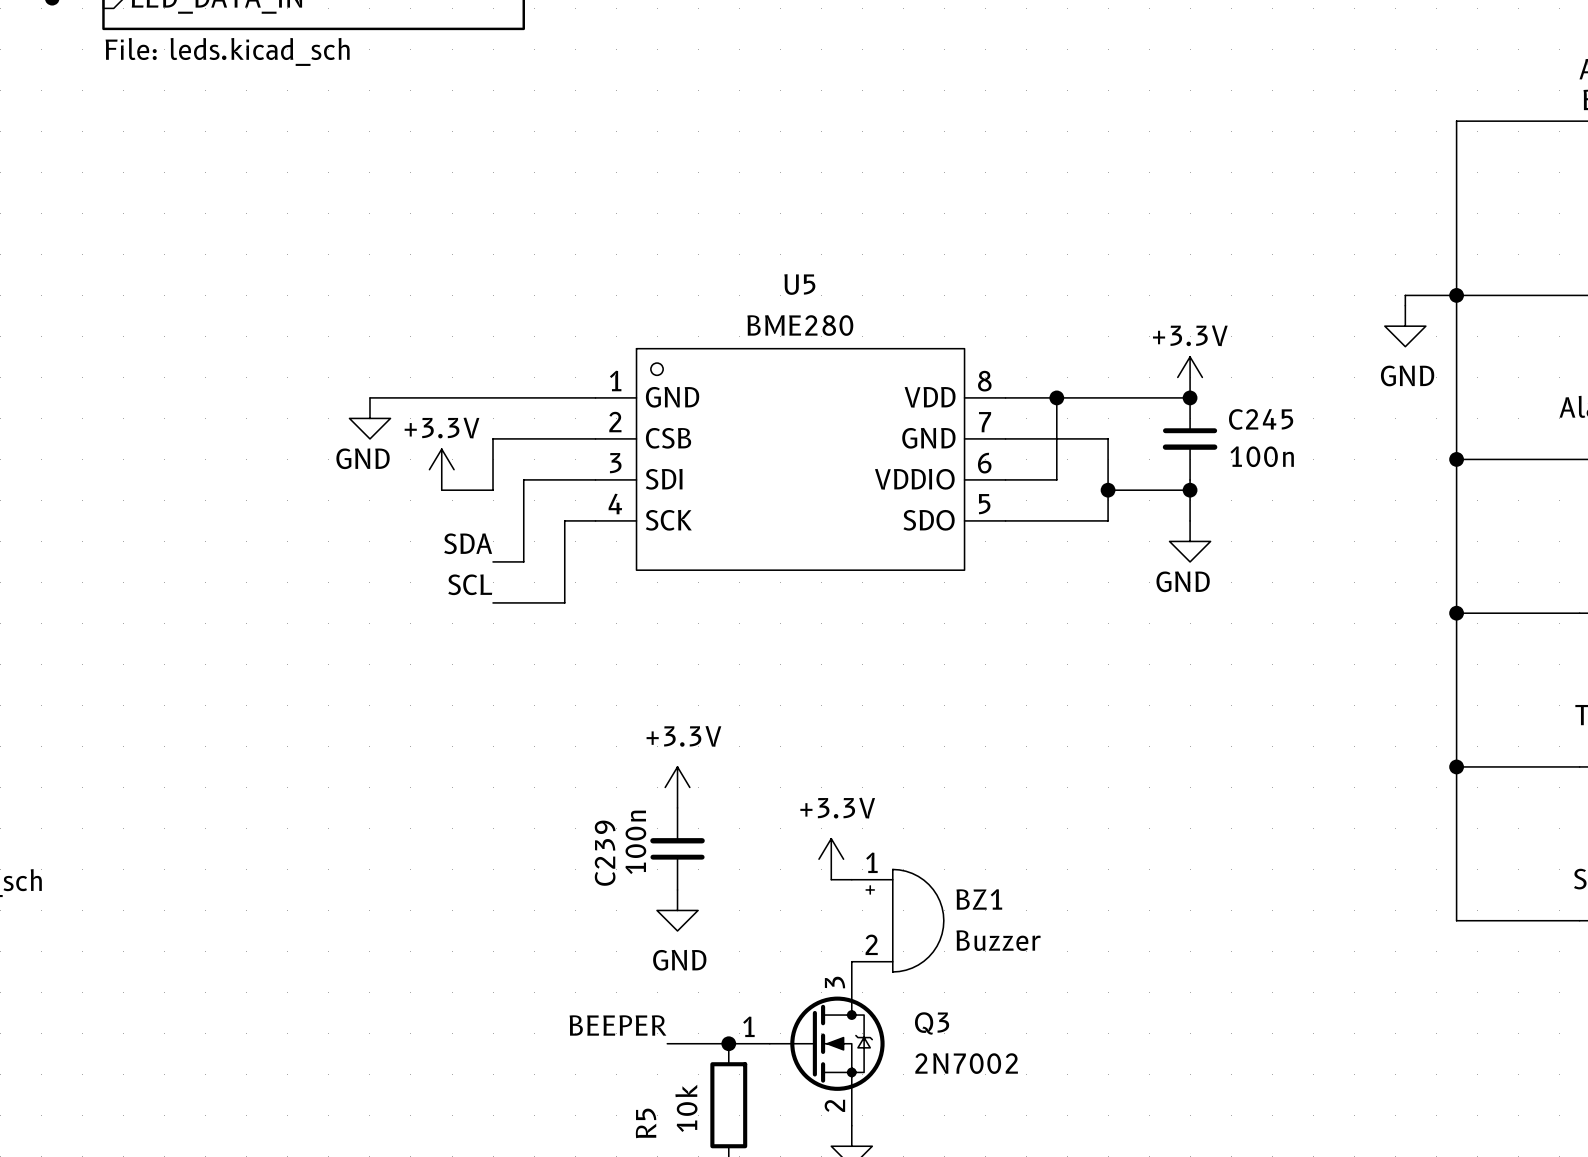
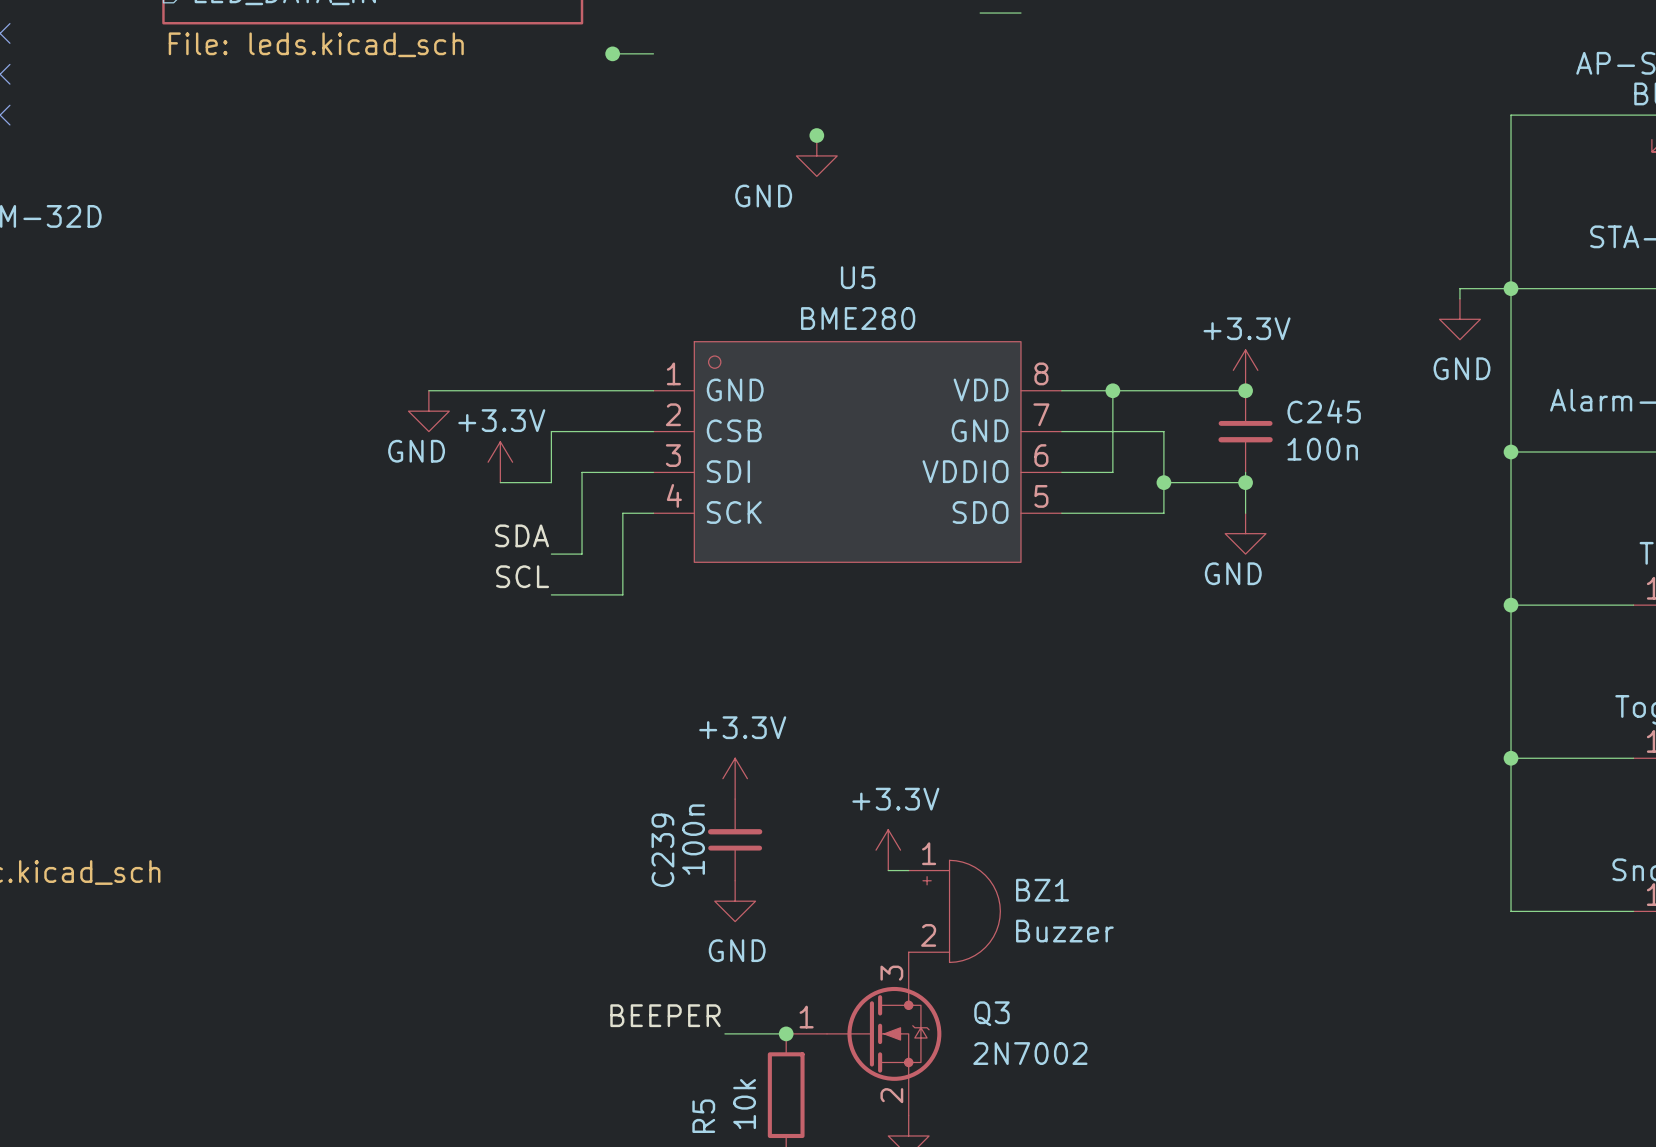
wire: none -> (980, 13) (1020, 13)
wire: none -> (612, 53) (653, 53)
junction: none -> (612, 53)
junction: none -> (816, 135)
power symbol: none -> GND (816, 155)

